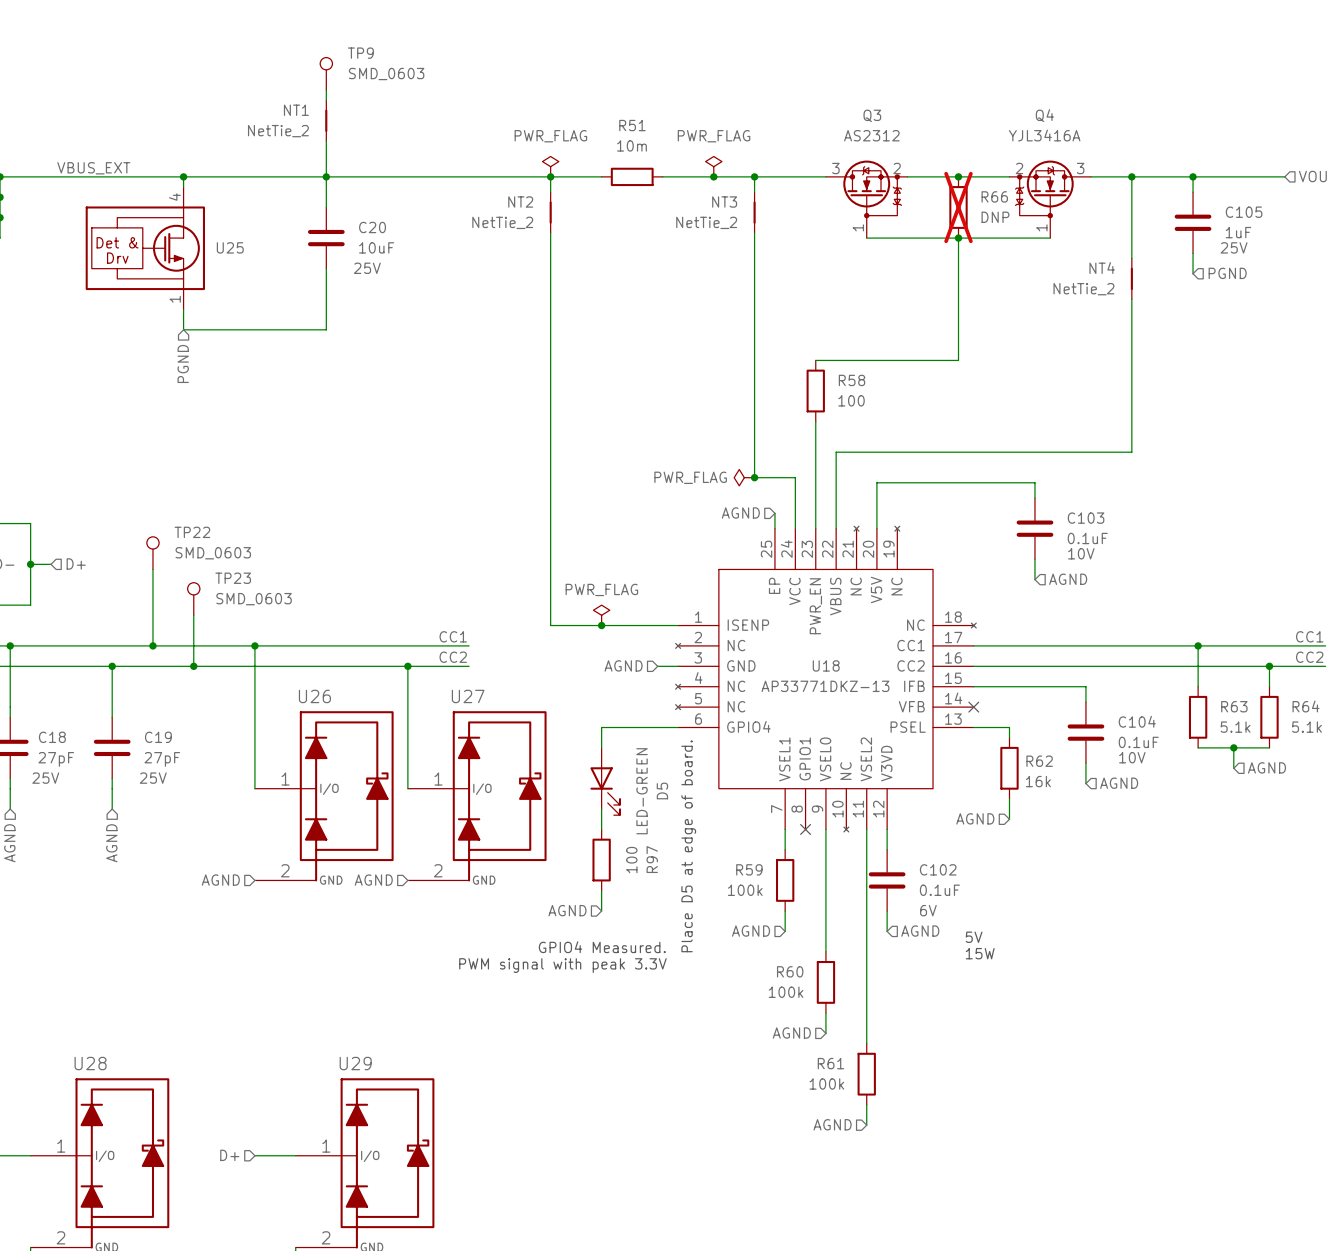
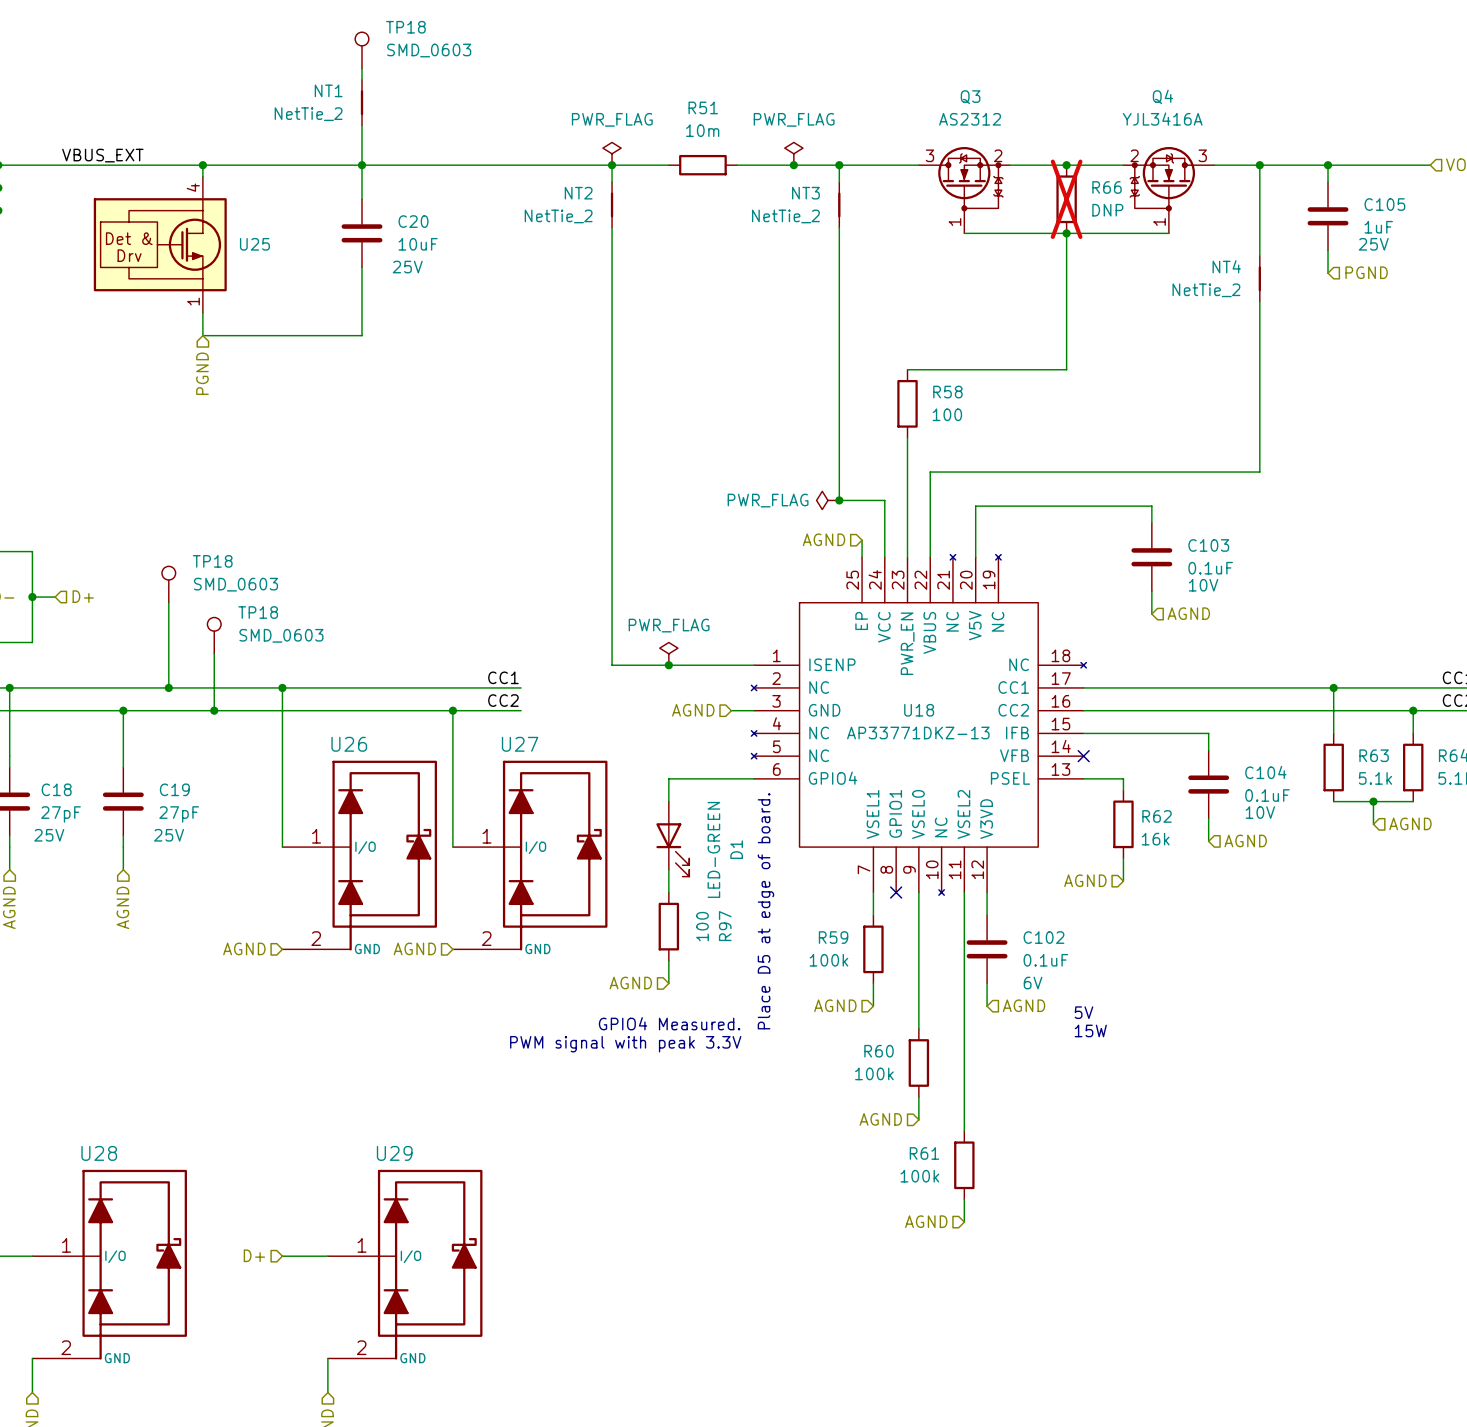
TP9 name: TP9 (360, 53) -> TP18 (405, 27)
TP22 name: TP22 (192, 532) -> TP18 (212, 561)
TP23 name: TP23 (233, 578) -> TP18 (258, 612)
D5 name: D5 (662, 790) -> D1 (736, 849)

